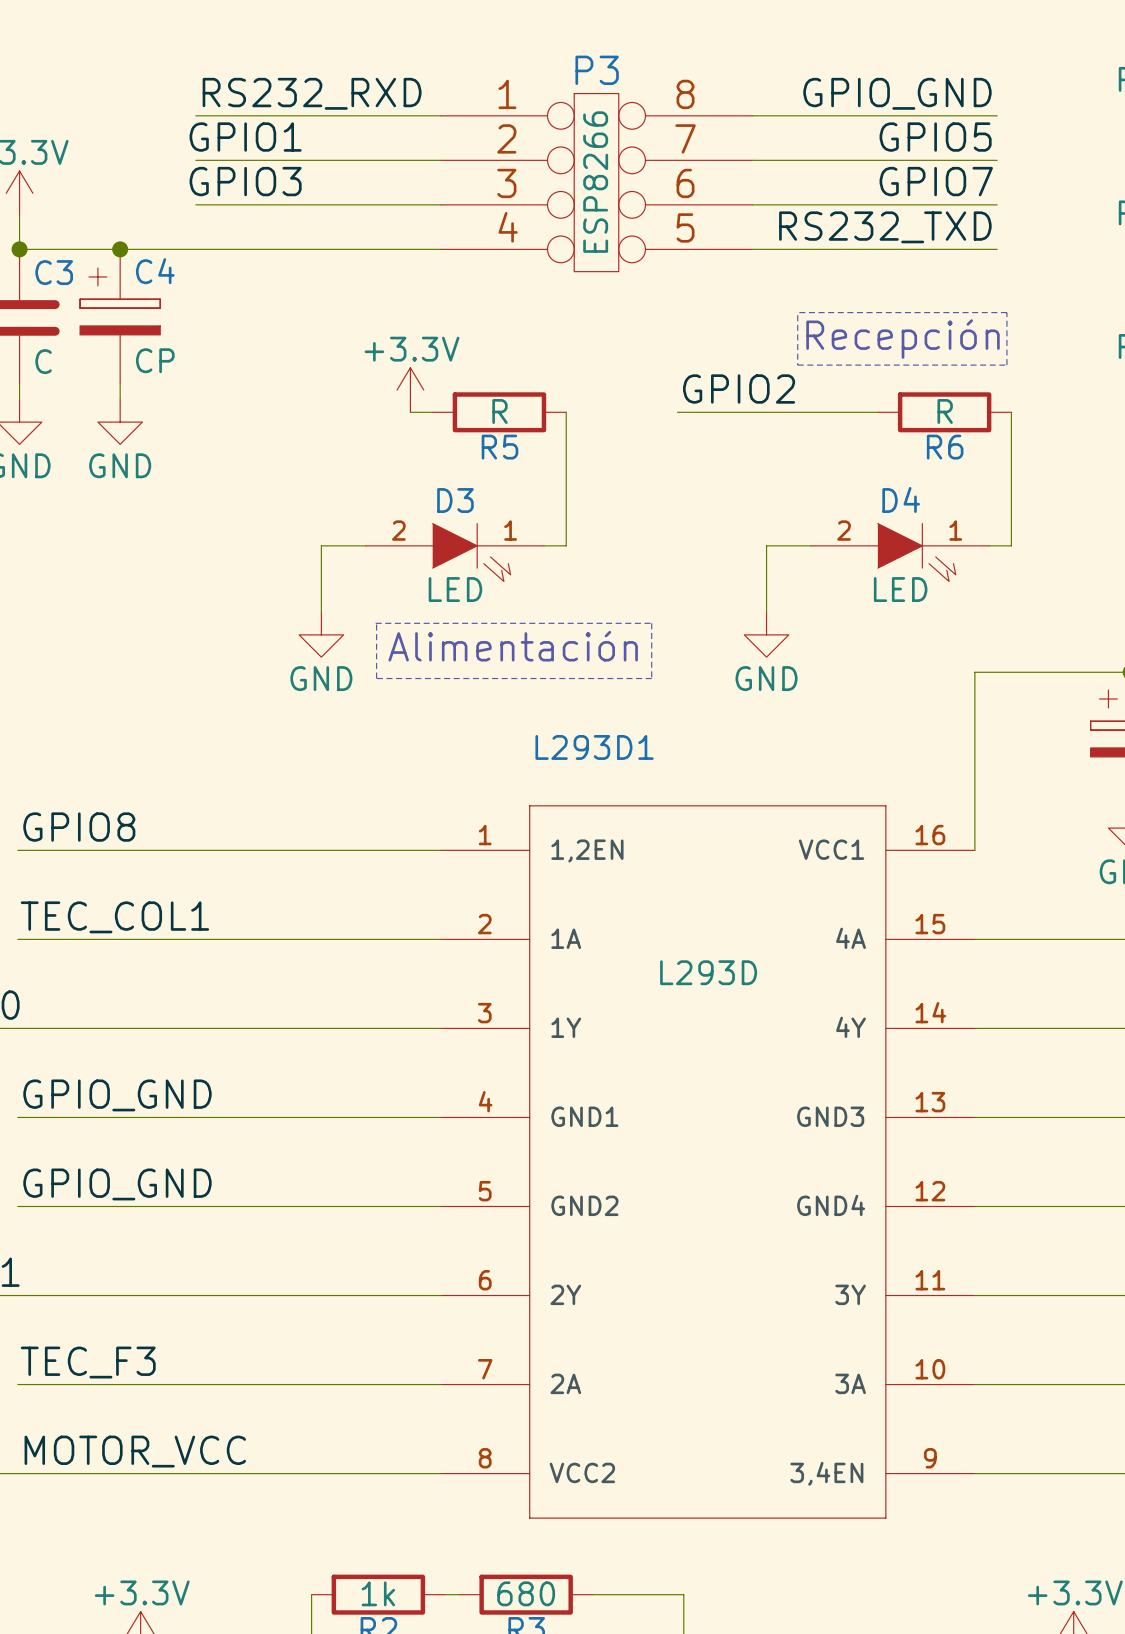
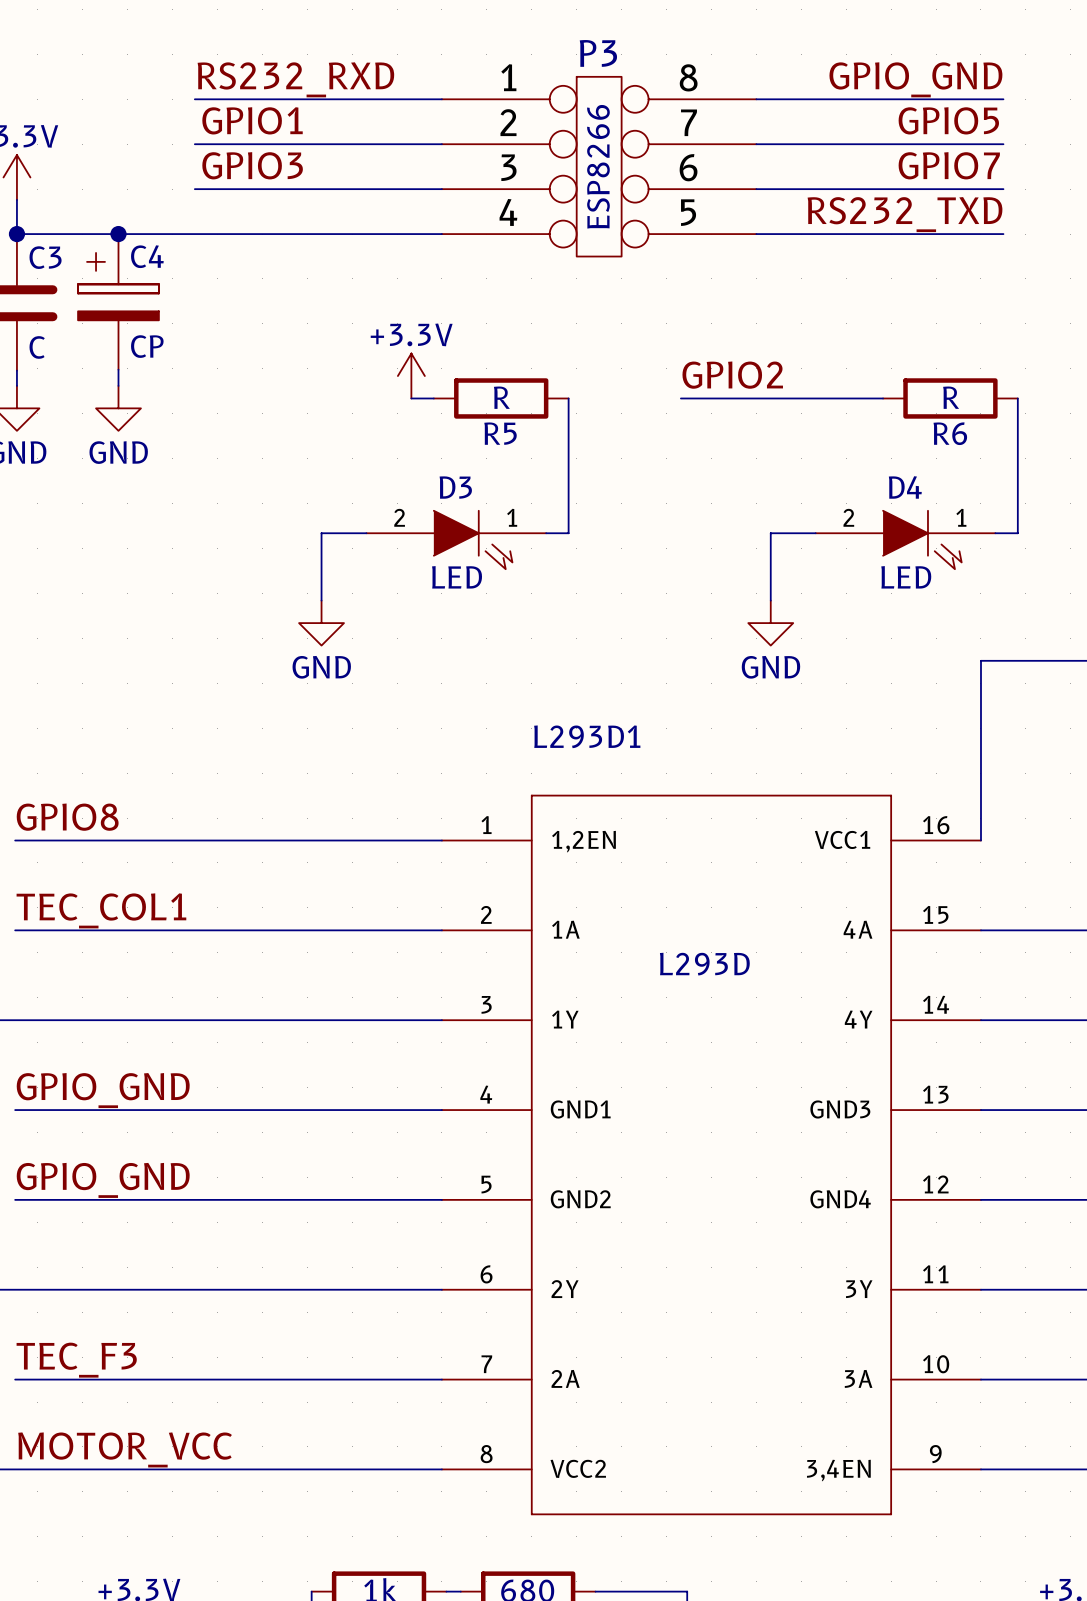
line: (797, 312) (1006, 312) (1006, 365) (797, 365) (797, 315) -> none
text: Recepción (903, 339) -> none
line: (375, 623) (651, 623) (651, 678) (376, 678) (376, 623) -> none
text: Alimentación (513, 646) -> none

